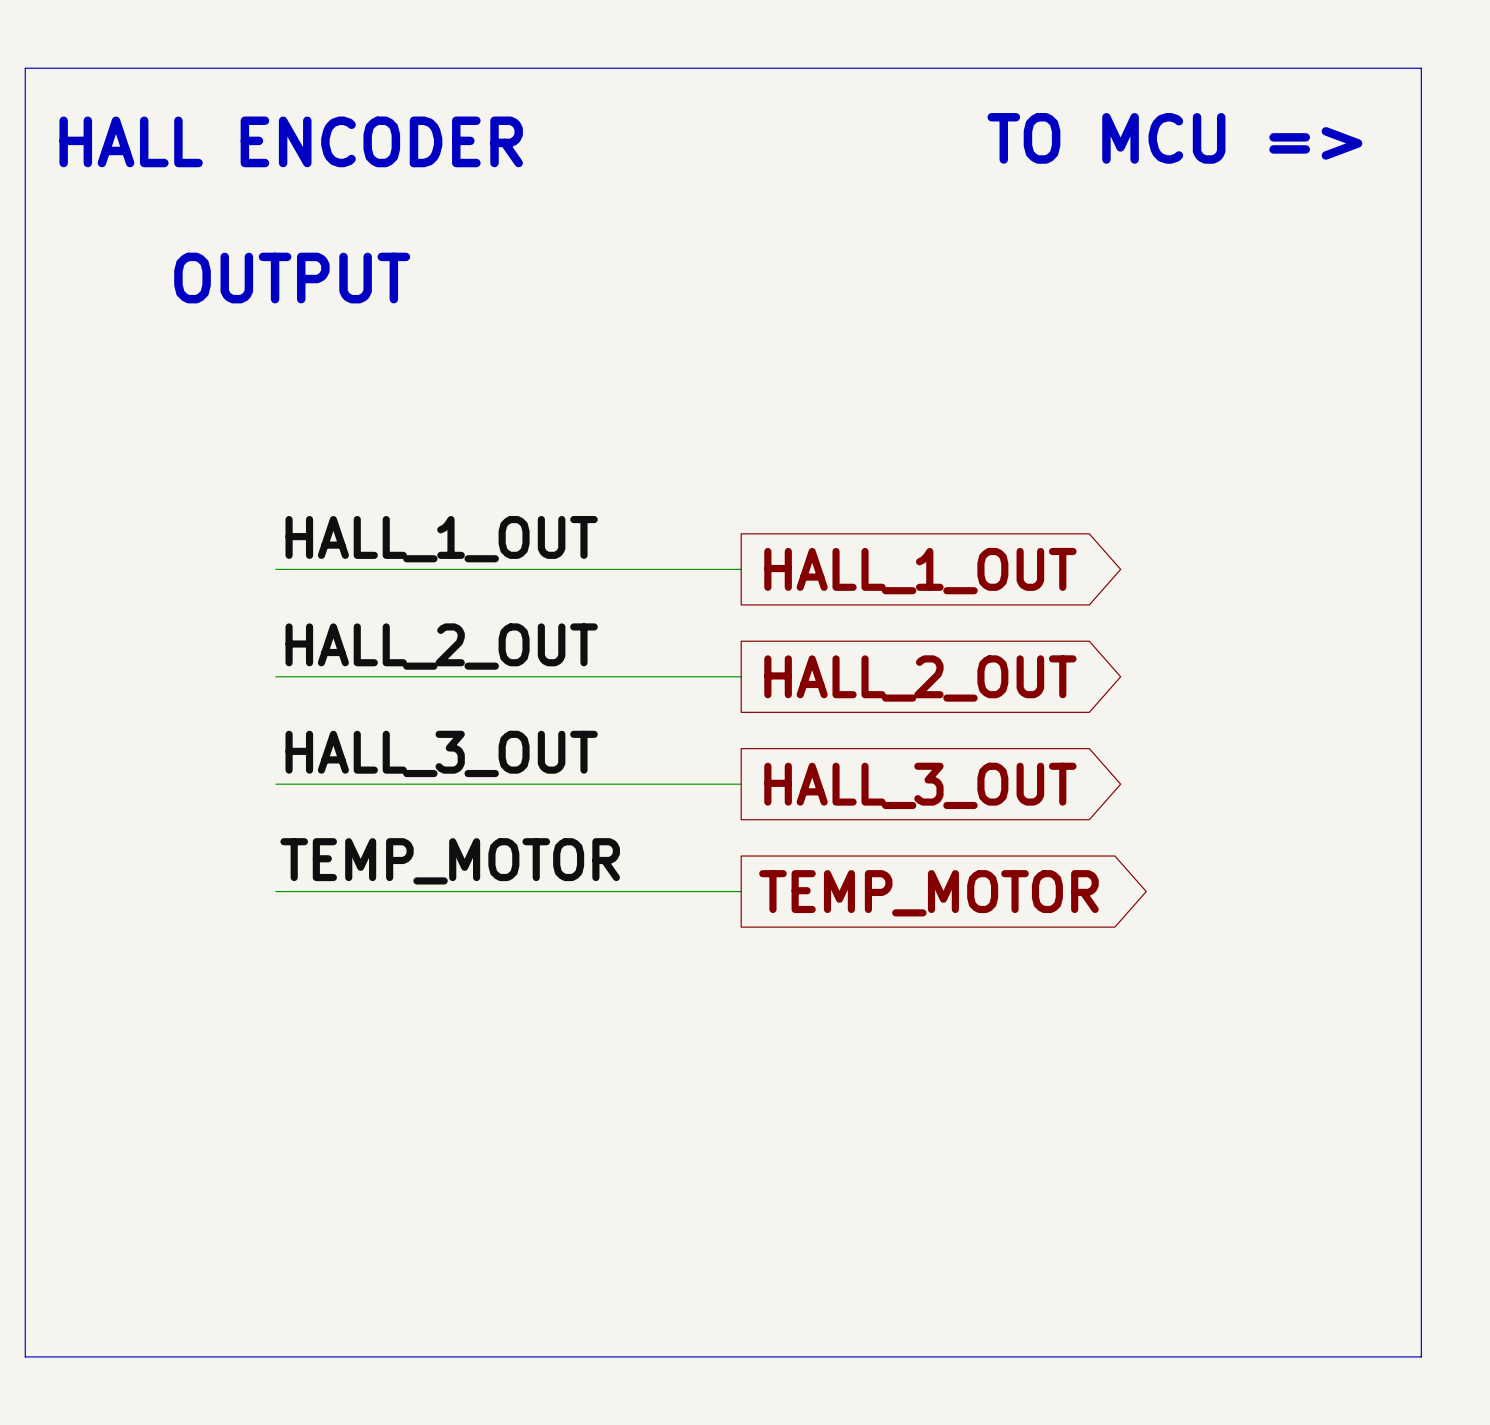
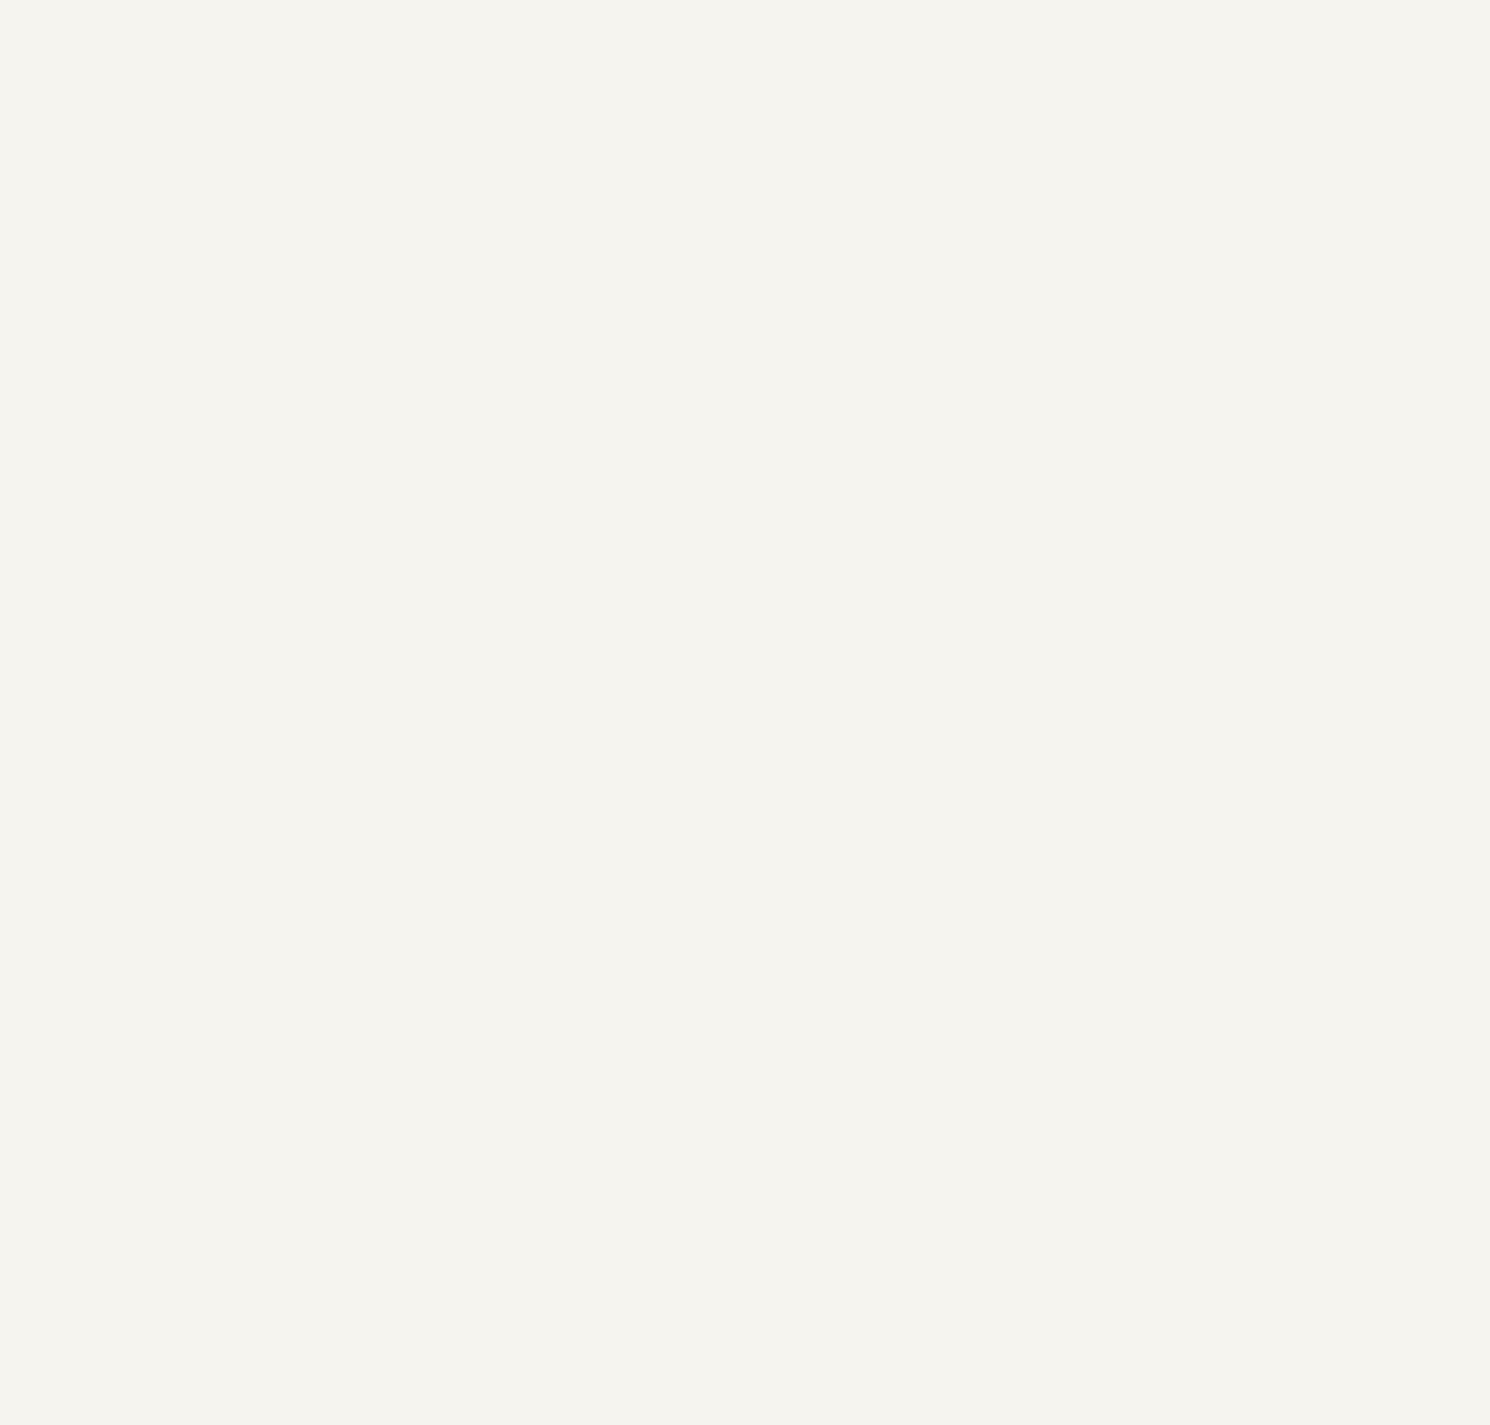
line: (25, 68) (1421, 68) (1421, 1356) (25, 1356) (25, 68) -> none
text: TO MCU => (1174, 138) -> none
text: HALL ENCODER (291, 141) -> none
text: OUTPUT (292, 278) -> none
label: HALL_1_OUT (441, 539) -> none
wire: (275, 569) (741, 569) -> none
global label: HALL_1_OUT (920, 571) -> none
label: HALL_2_OUT (441, 646) -> none
wire: (275, 676) (741, 676) -> none
global label: HALL_2_OUT (920, 678) -> none
label: HALL_3_OUT (441, 753) -> none
wire: (275, 784) (741, 784) -> none
global label: HALL_3_OUT (920, 785) -> none
label: TEMP_MOTOR (450, 861) -> none
wire: (275, 891) (741, 891) -> none
global label: TEMP_MOTOR (928, 893) -> none

